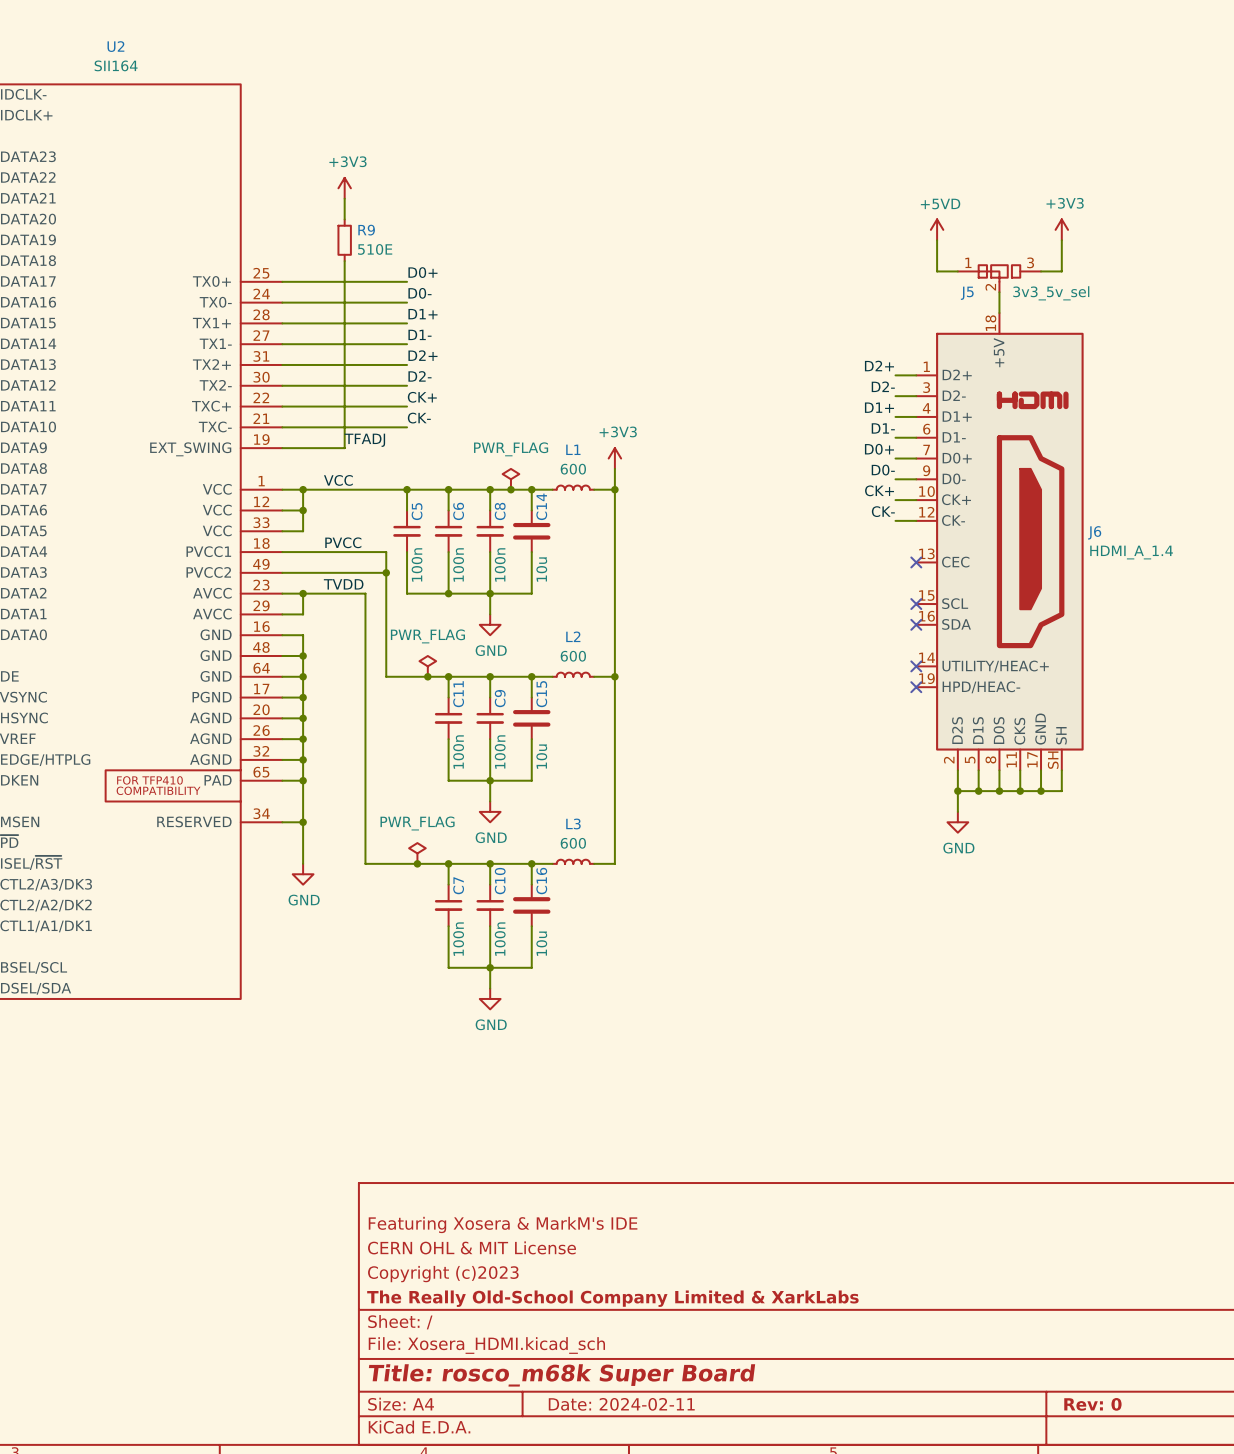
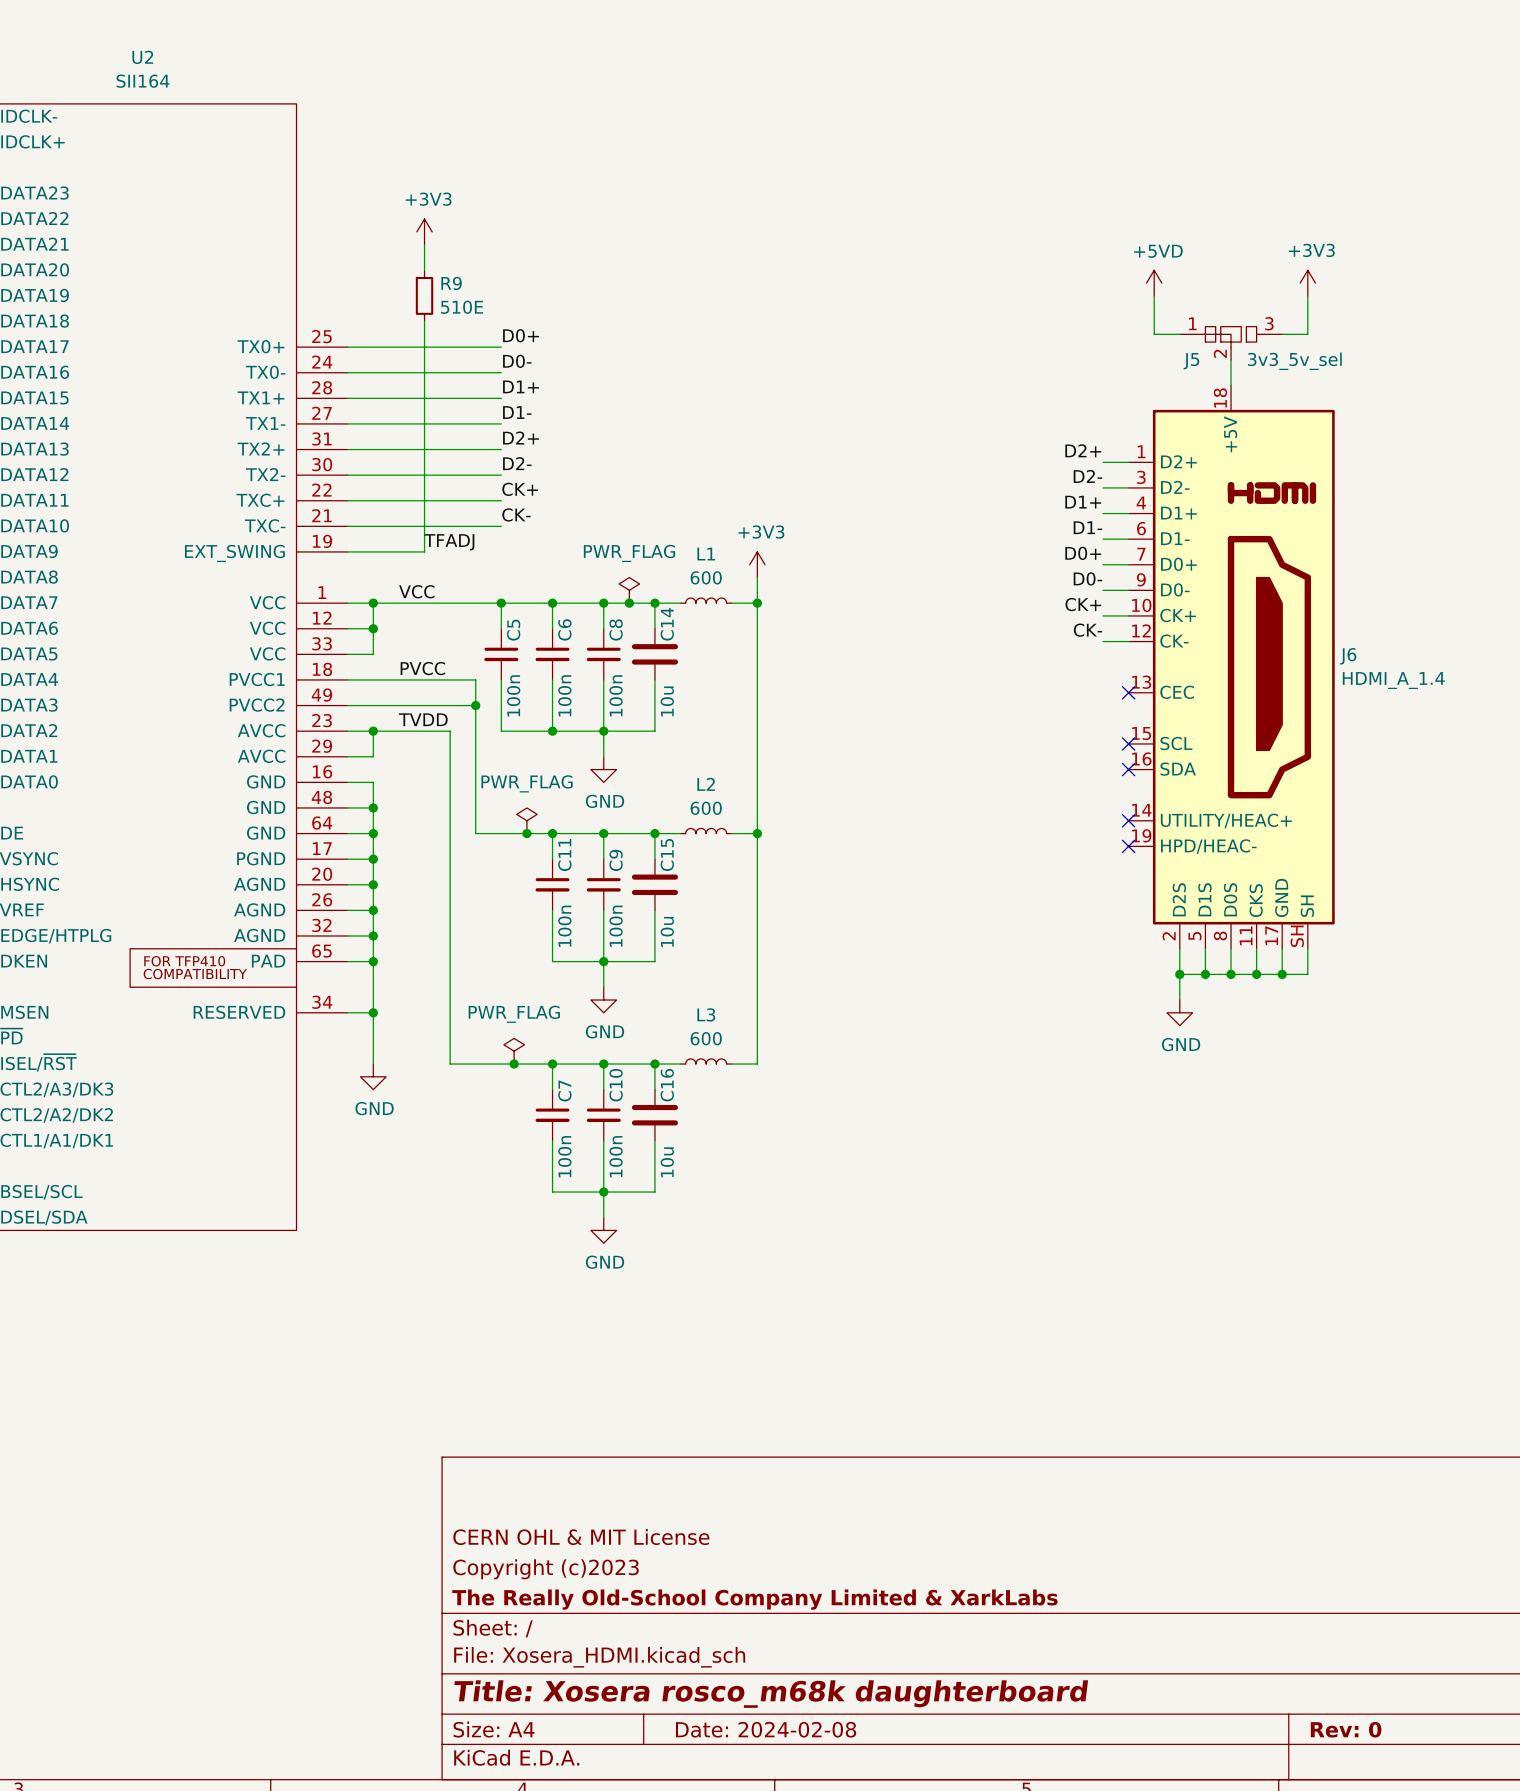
title block: Featuring Xosera & MarkM's IDE (503, 1224) -> none
title block: Title: rosco_m68k Super Board (562, 1375) -> Title: Xosera rosco_m68k daughterboard (771, 1694)
title block: Date: 2024-02-11 (621, 1404) -> Date: 2024-02-08 (766, 1729)

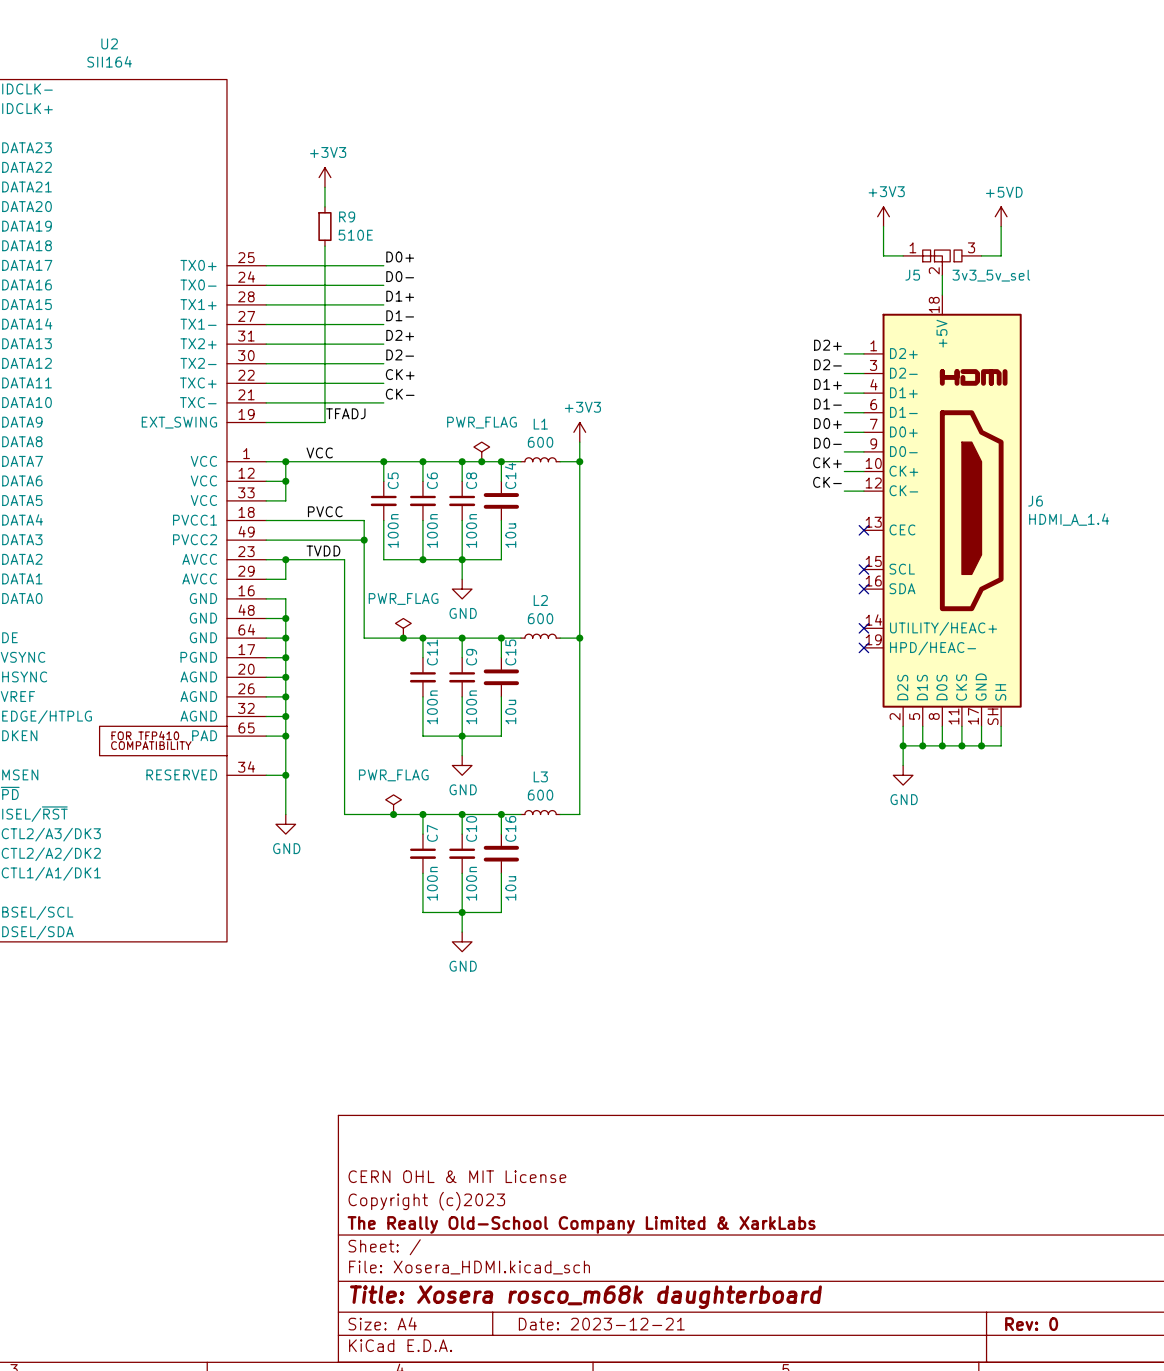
power symbol: +5VD (1154, 283) -> +3V3 (883, 216)
power symbol: +3V3 (1307, 283) -> +5VD (1001, 216)
title block: Date: 2024-02-08 (766, 1729) -> Date: 2023-12-21 (601, 1324)

